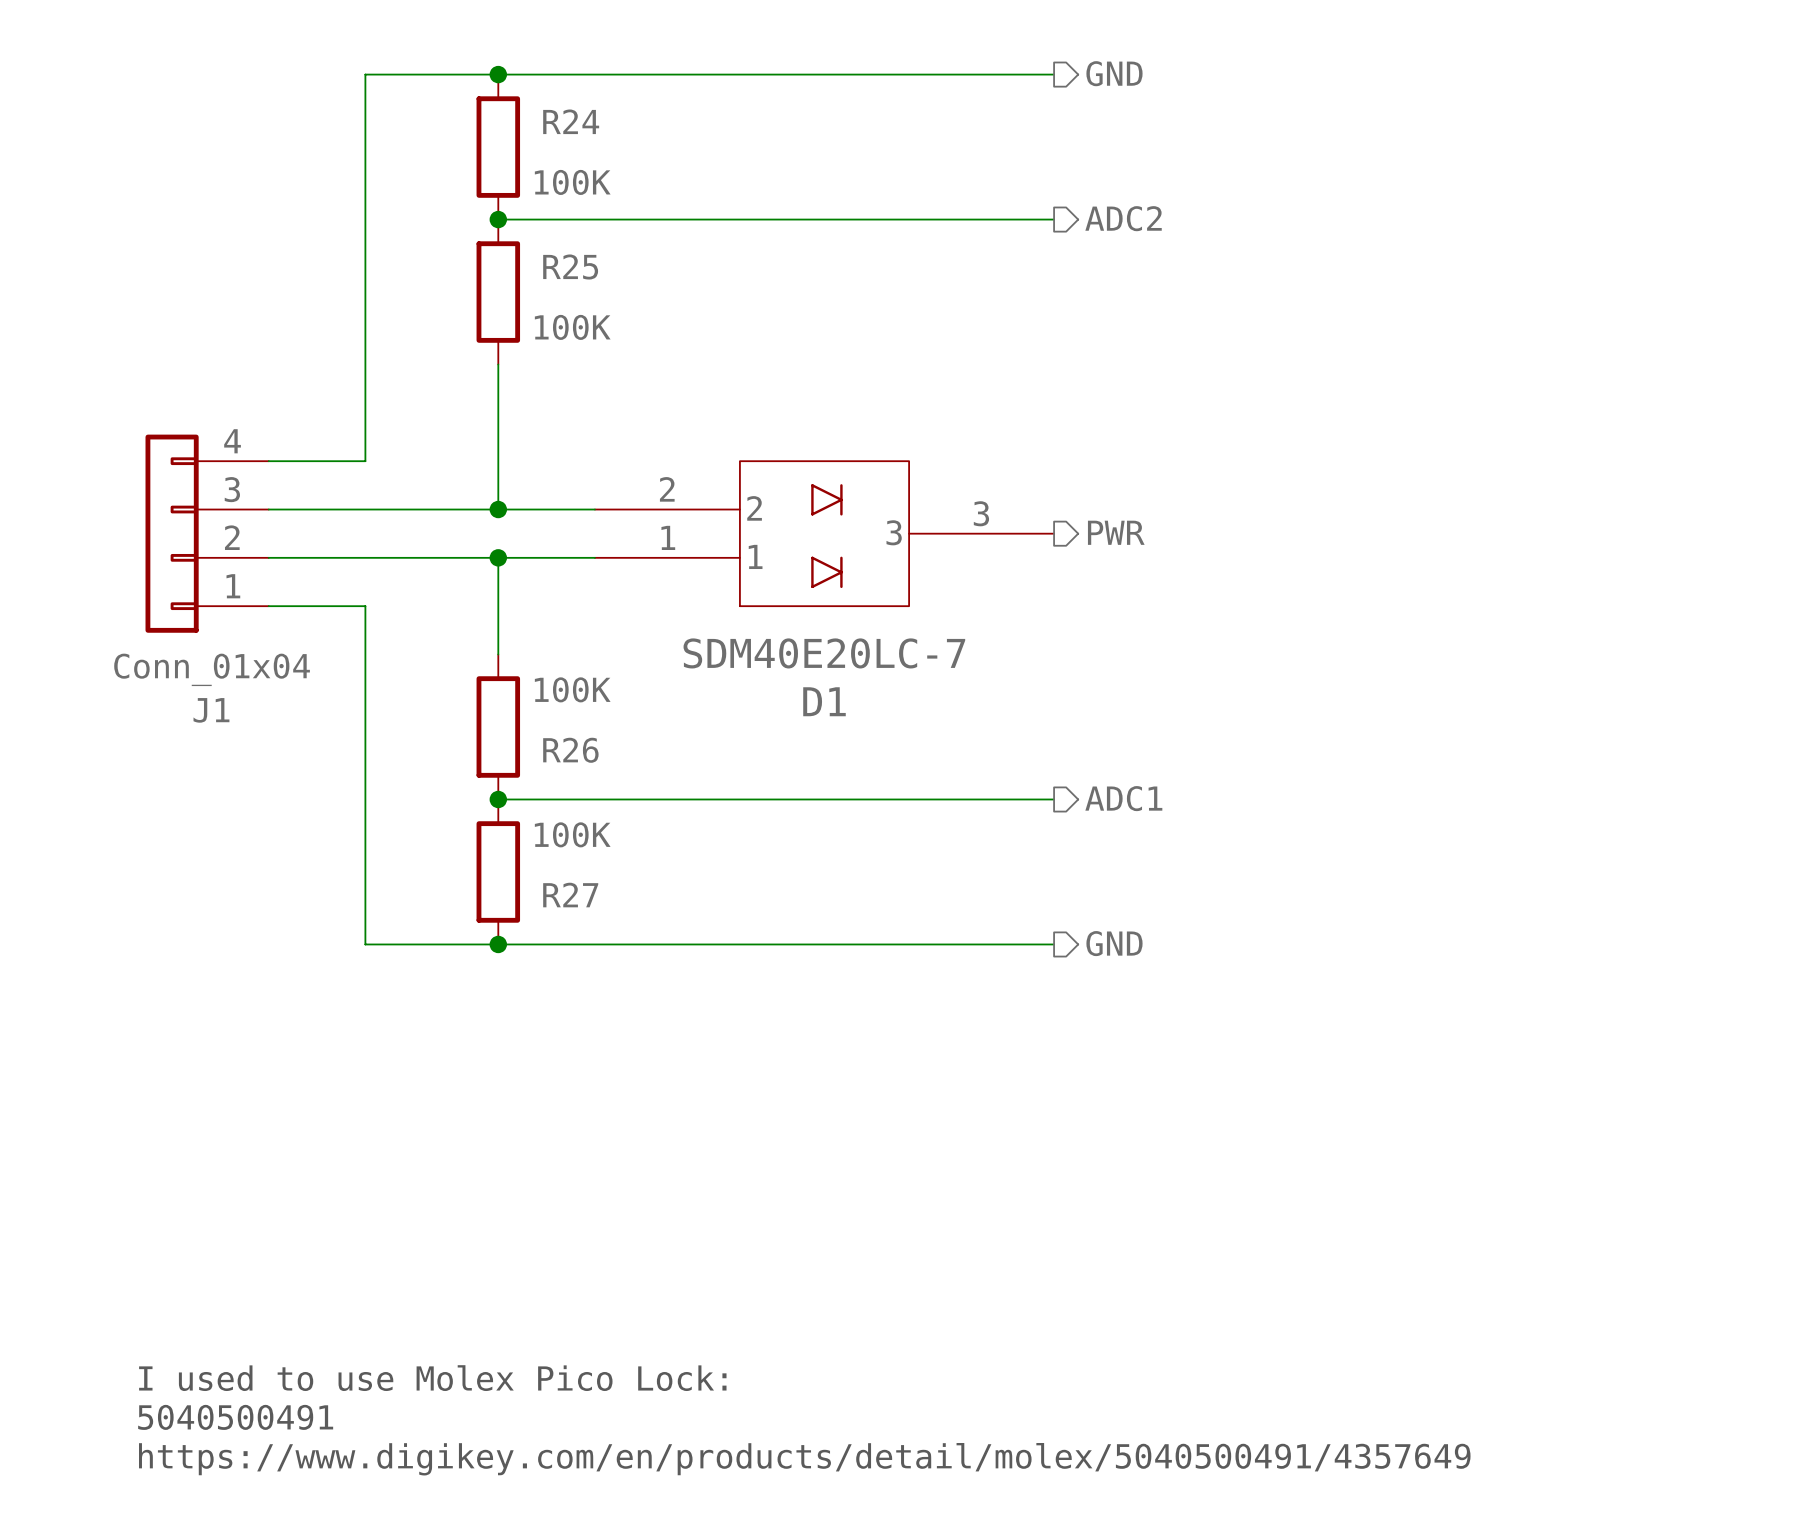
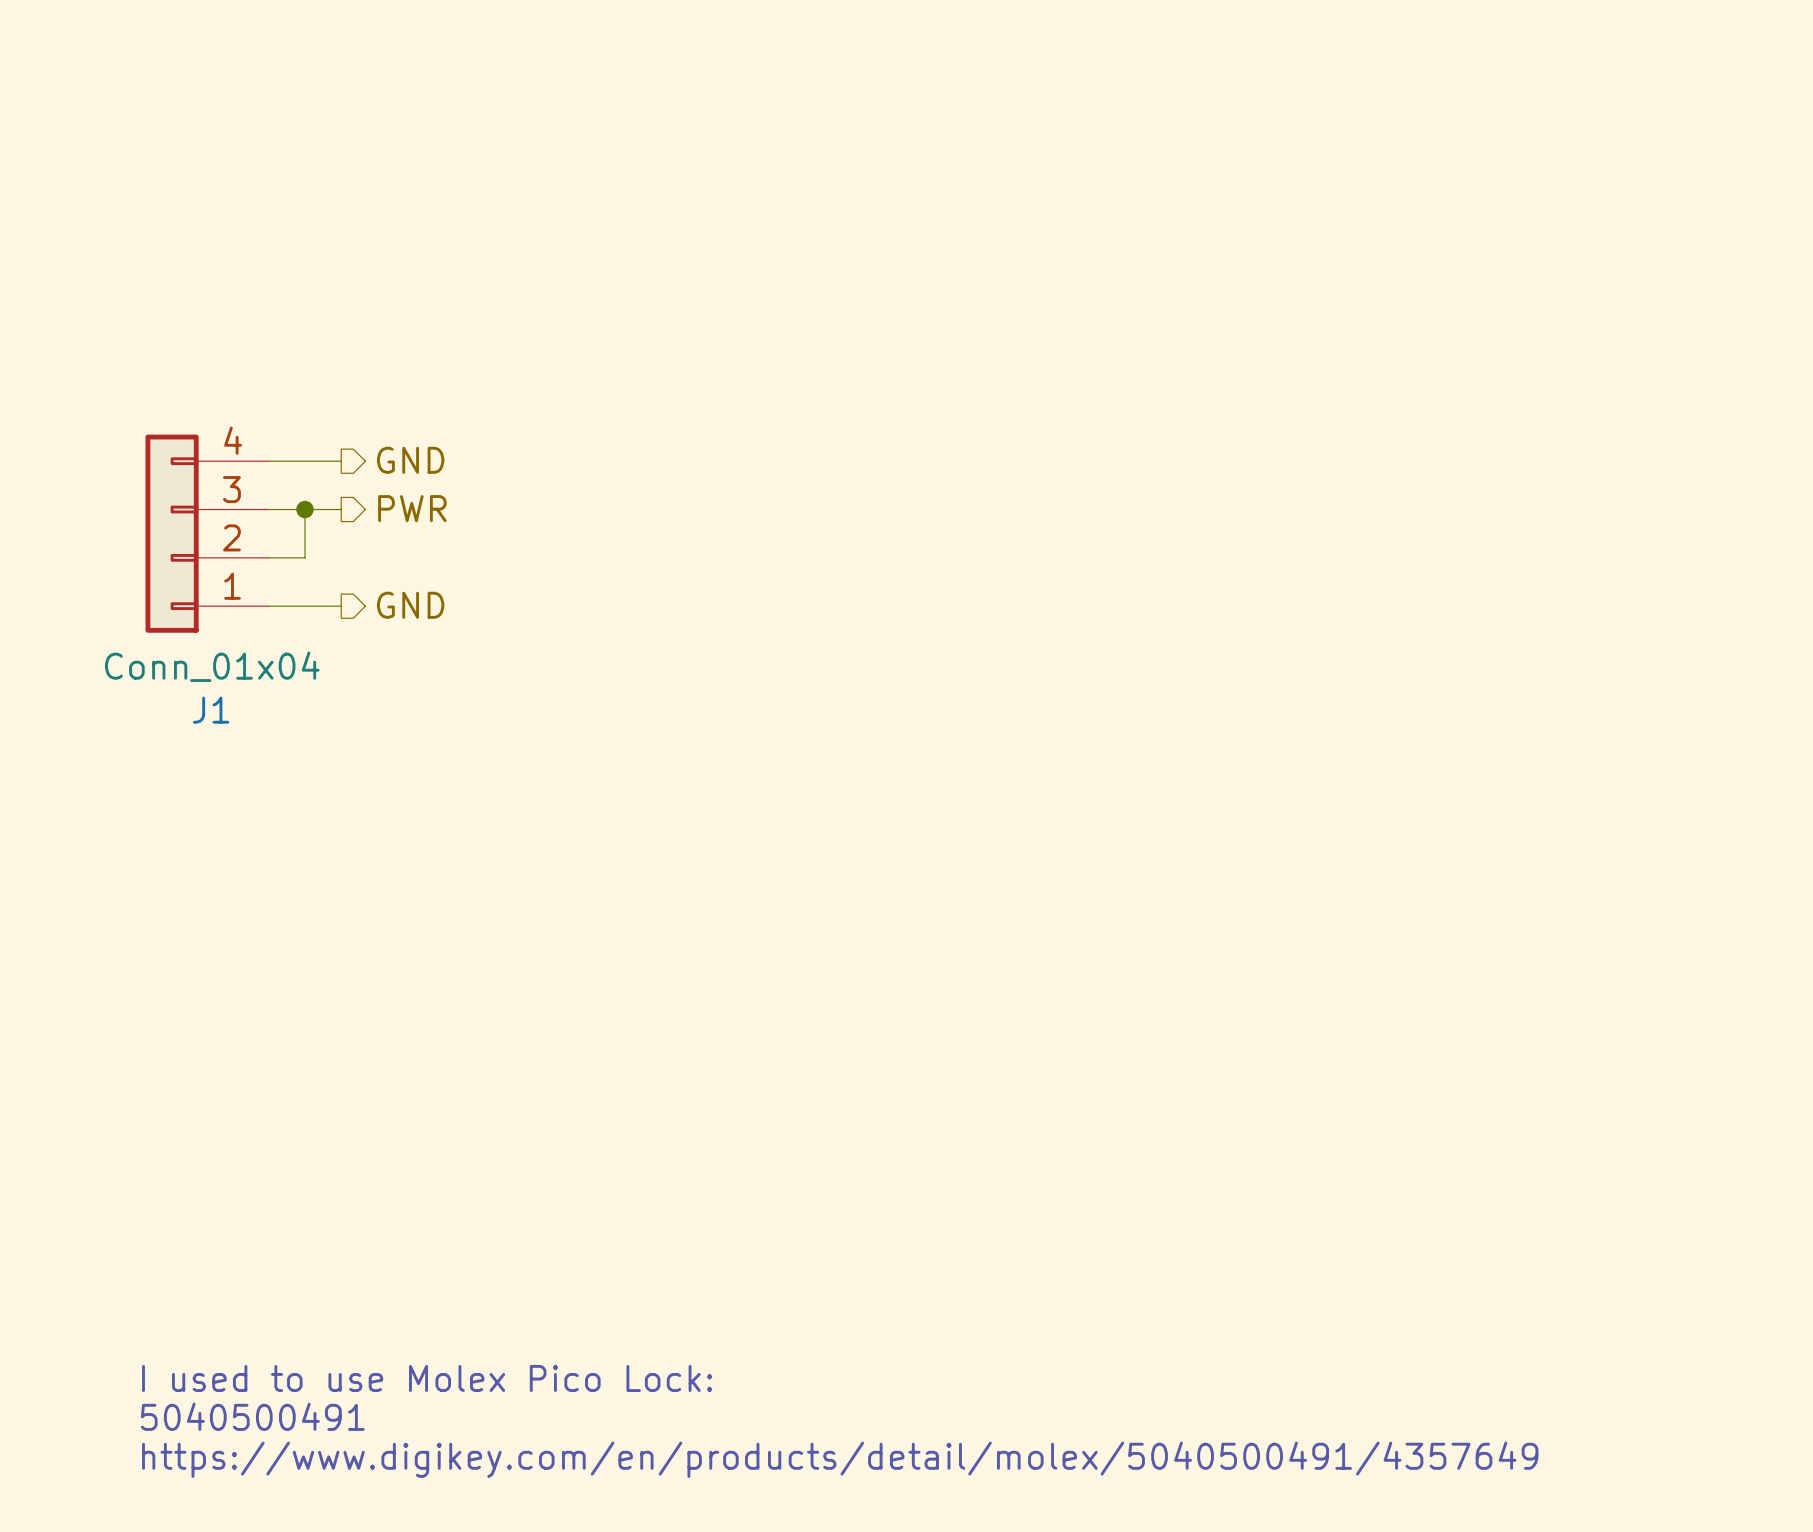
hierarchical label: GND (1114, 73) -> none
junction: (498, 74) -> none
wire: (1054, 74) (365, 74) (365, 461) (341, 461) -> none
R24: 100K (498, 147) -> none
hierarchical label: ADC2 (1123, 218) -> none
wire: (498, 219) (1054, 219) -> none
junction: (498, 219) -> none
R25: 100K (498, 292) -> none
wire: (498, 364) (498, 509) -> none
hierarchical label: none -> GND (410, 460)
hierarchical label: none -> PWR (412, 508)
junction: none -> (304, 509)
wire: (341, 509) (594, 509) -> none
junction: (498, 509) -> none
hierarchical label: PWR (1116, 532) -> none
D1: SDM40E20LC-7 (824, 533) -> none
wire: (304, 557) (594, 557) -> (304, 557) (304, 509)
wire: (498, 557) (498, 654) -> none
junction: (498, 557) -> none
hierarchical label: none -> GND (410, 605)
wire: (341, 606) (365, 606) (365, 944) (1054, 944) -> none
R26: 100K (498, 726) -> none
hierarchical label: ADC1 (1123, 798) -> none
wire: (498, 799) (1054, 799) -> none
junction: (498, 799) -> none
R27: 100K (498, 871) -> none
hierarchical label: GND (1114, 943) -> none
junction: (498, 944) -> none

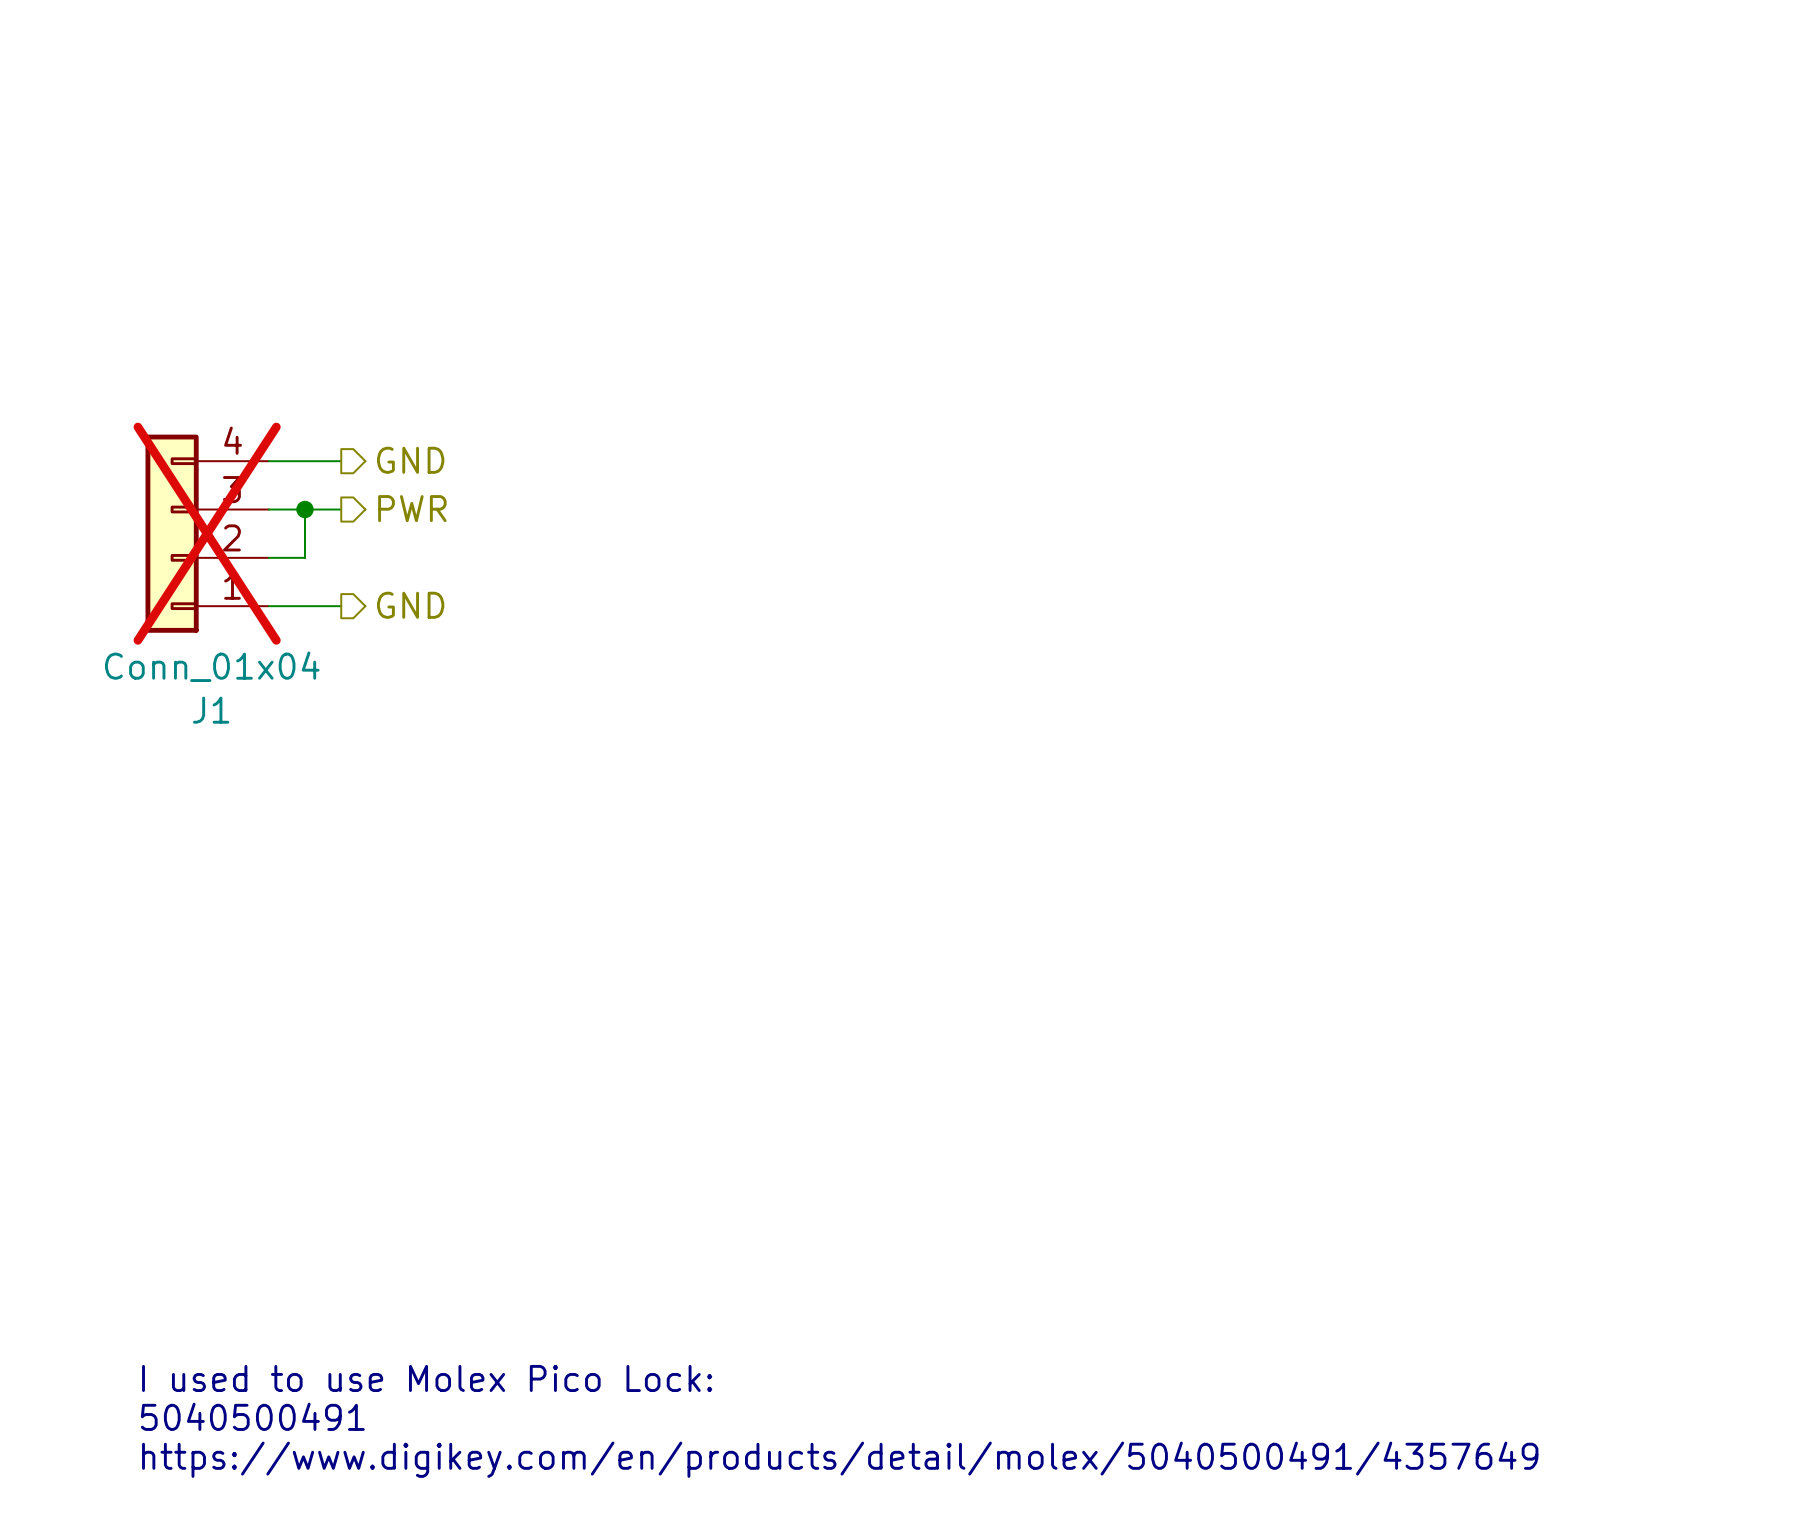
J1 do-not-place cross: none -> (207, 533)

